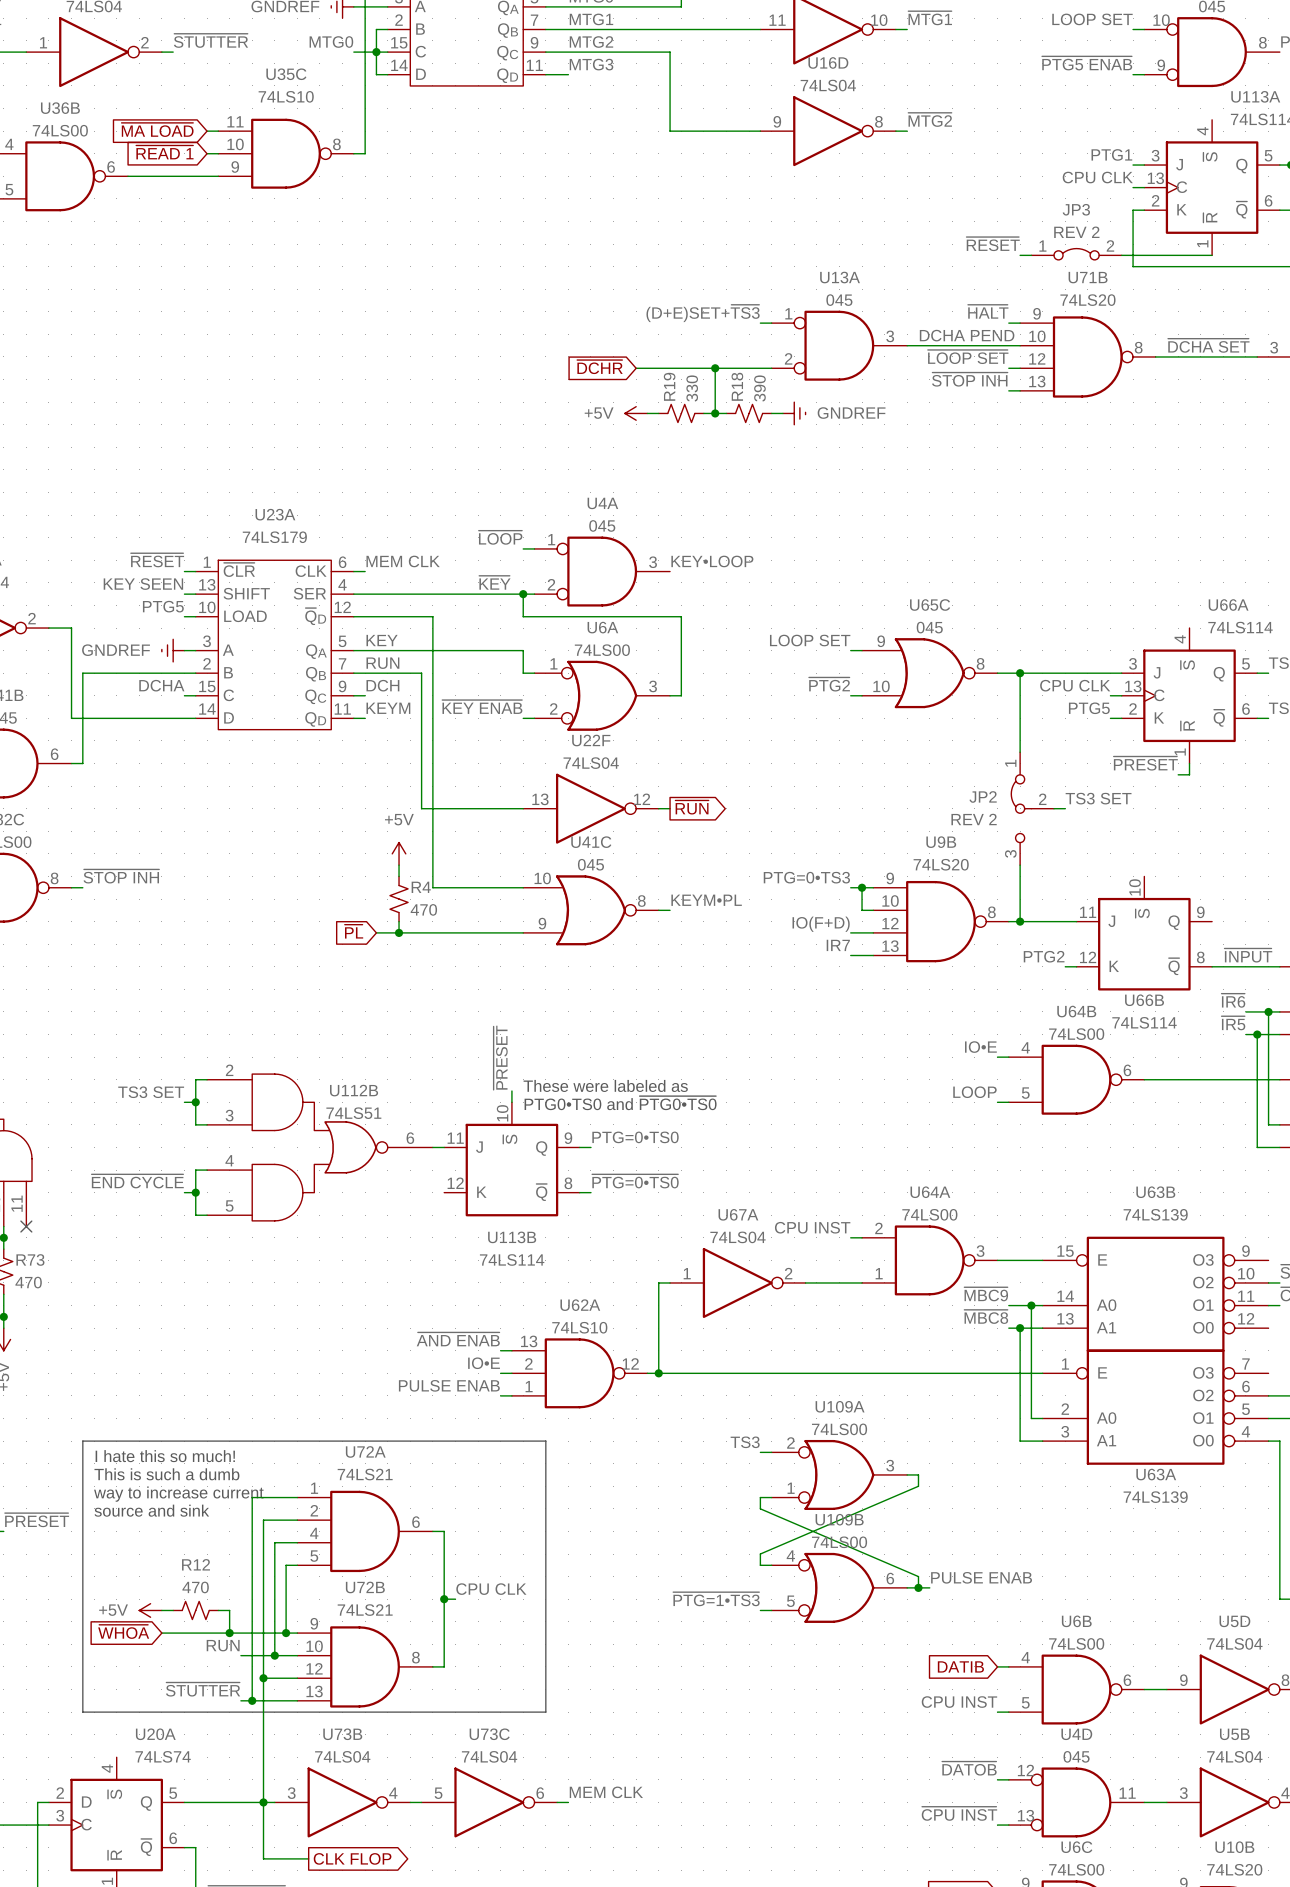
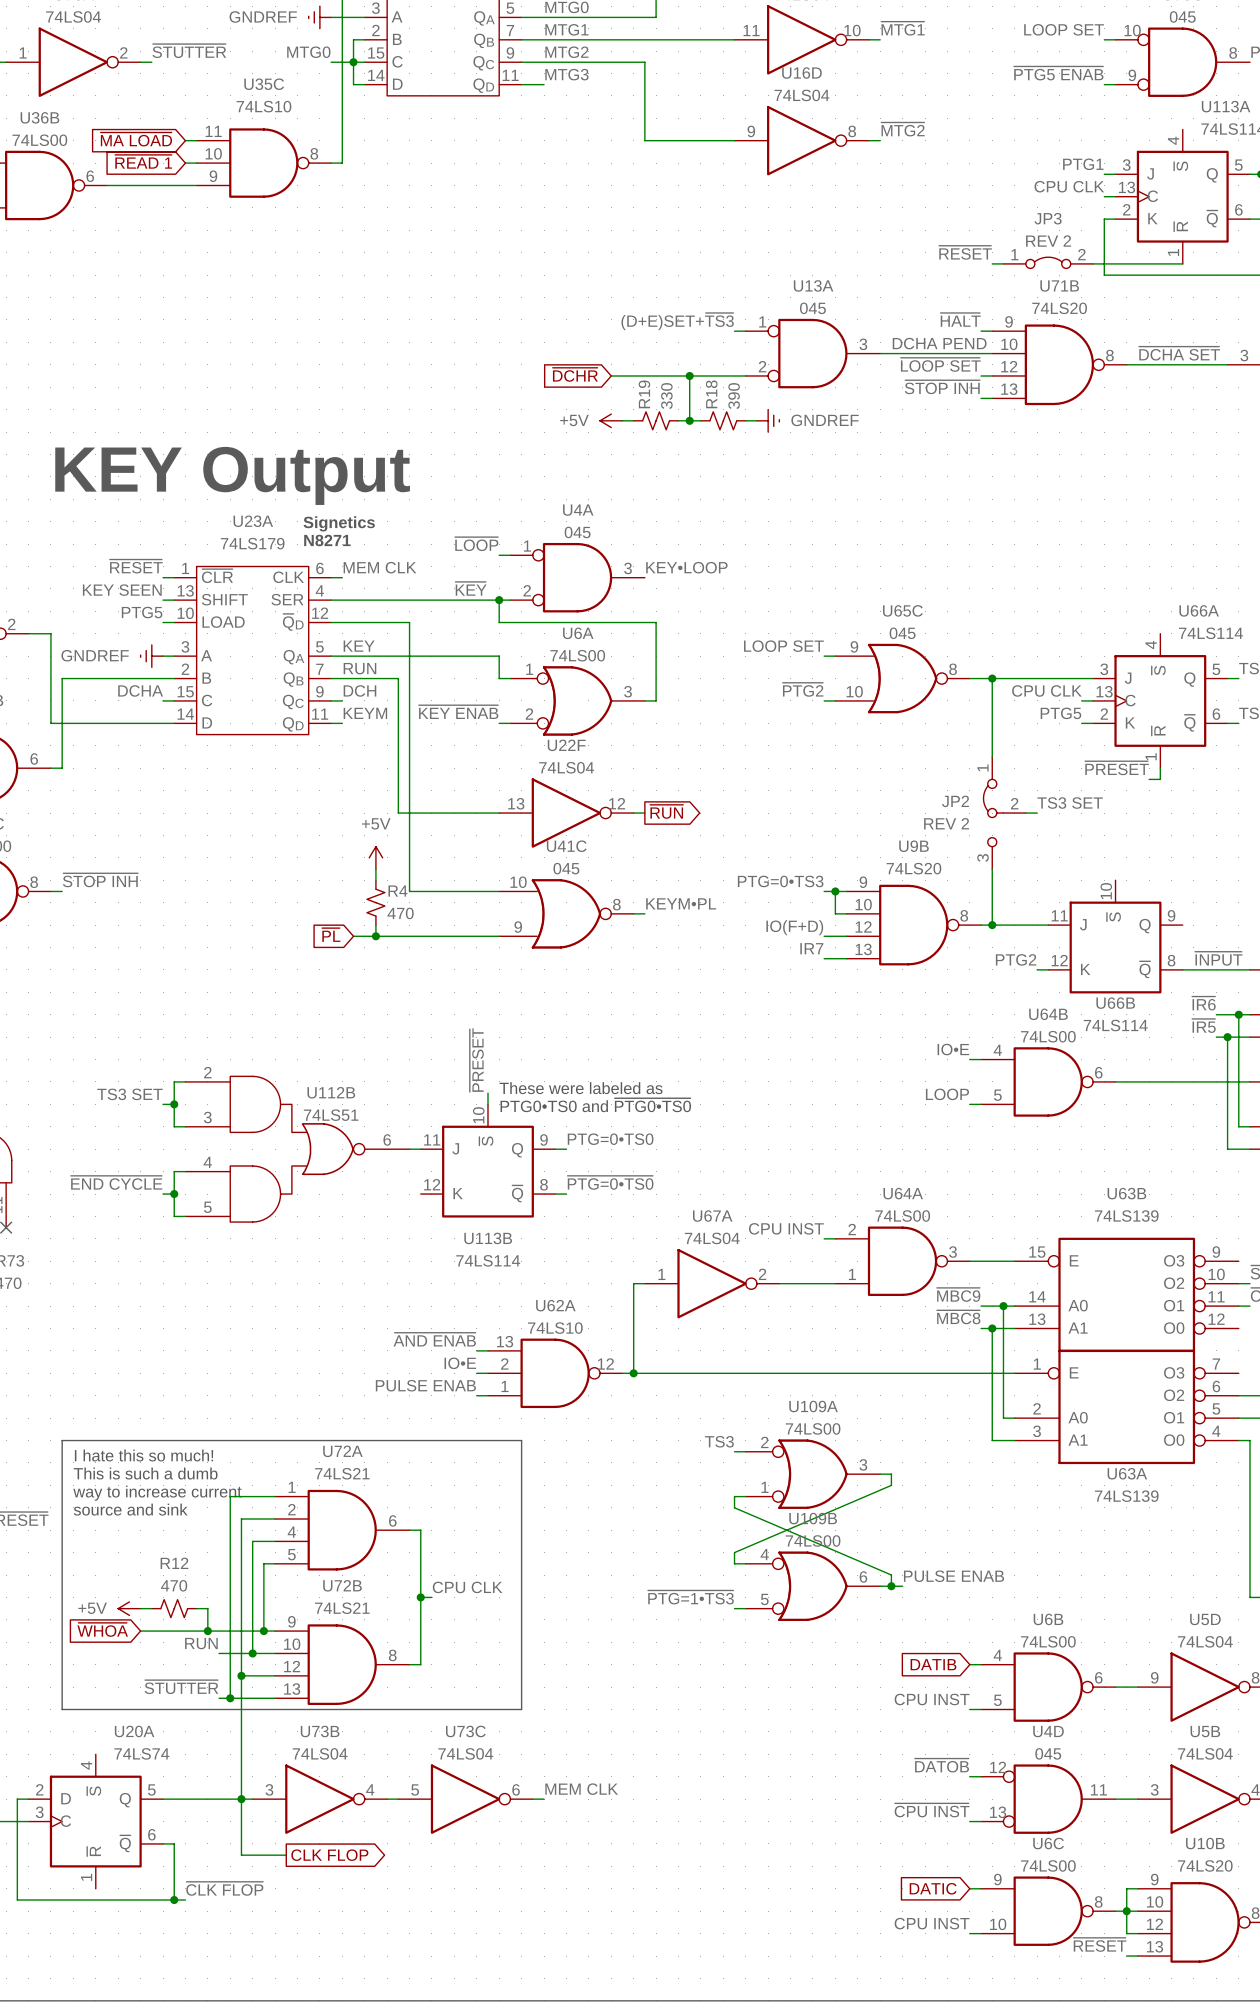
text: none -> KEY Output (232, 475)
text: none -> Signetics (339, 523)
text: none -> N8271 (327, 540)

